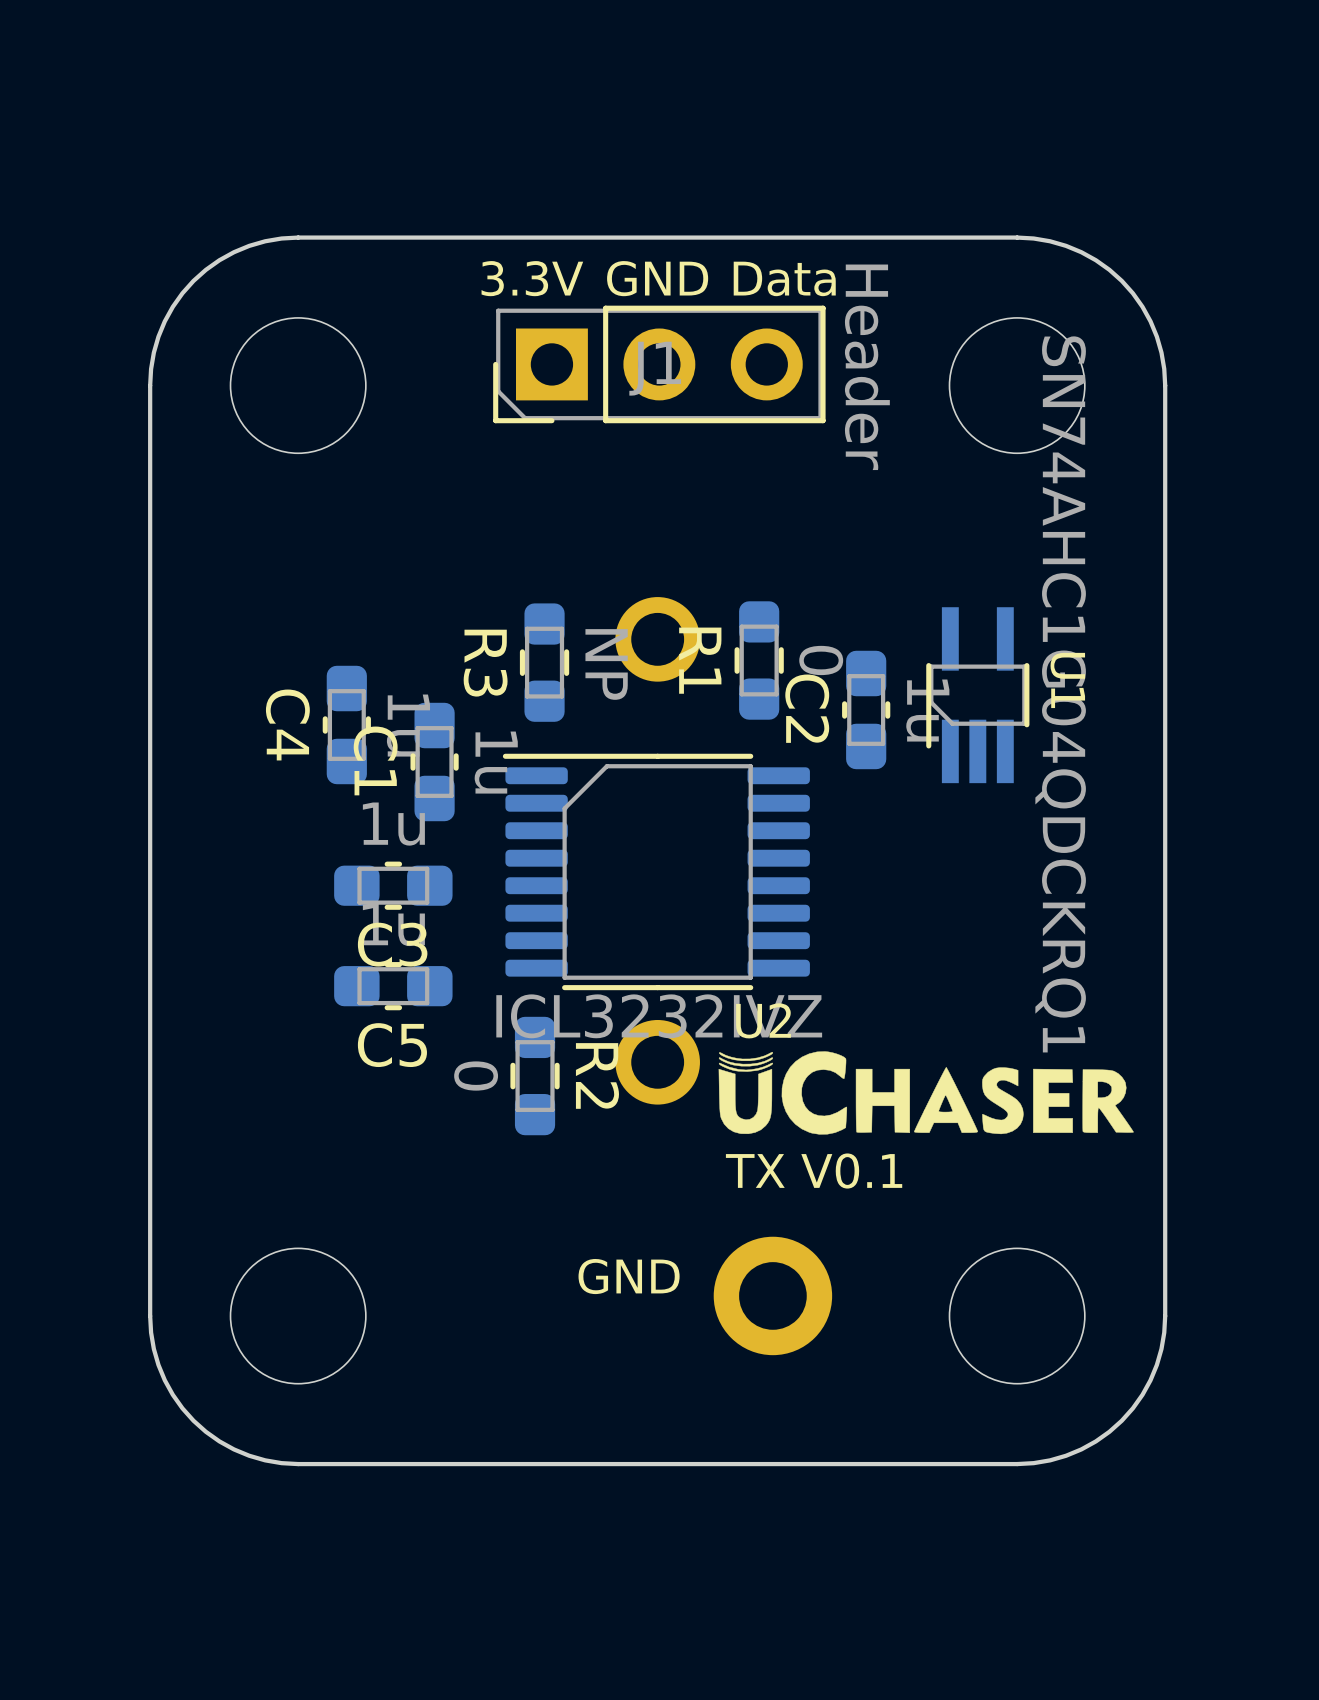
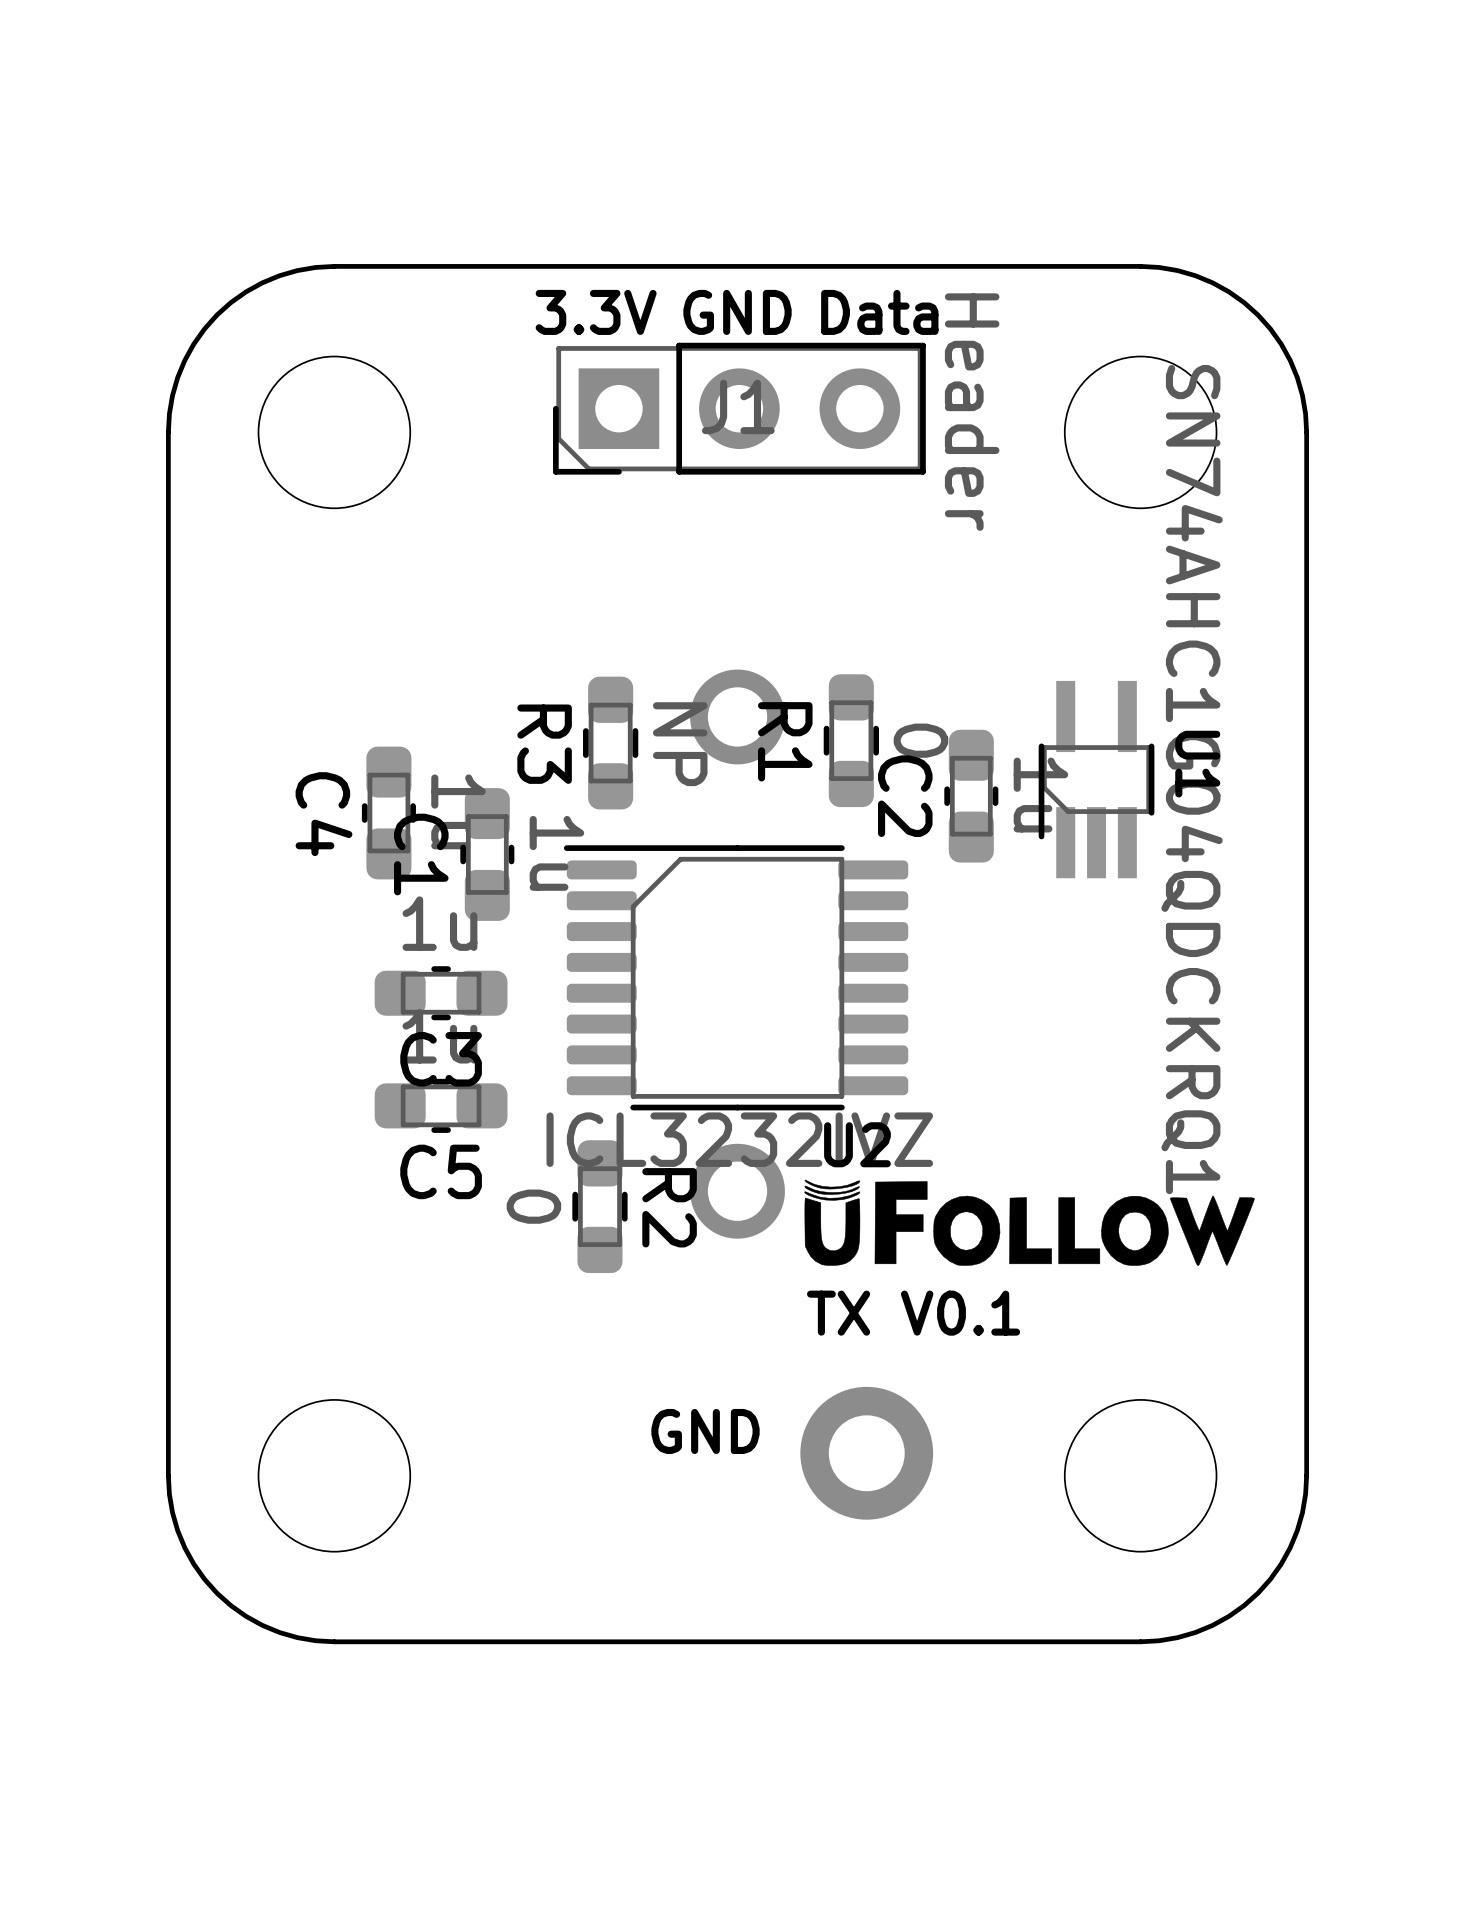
drawing shape: [718, 1051, 1134, 1135] -> [804, 1179, 1255, 1266]

